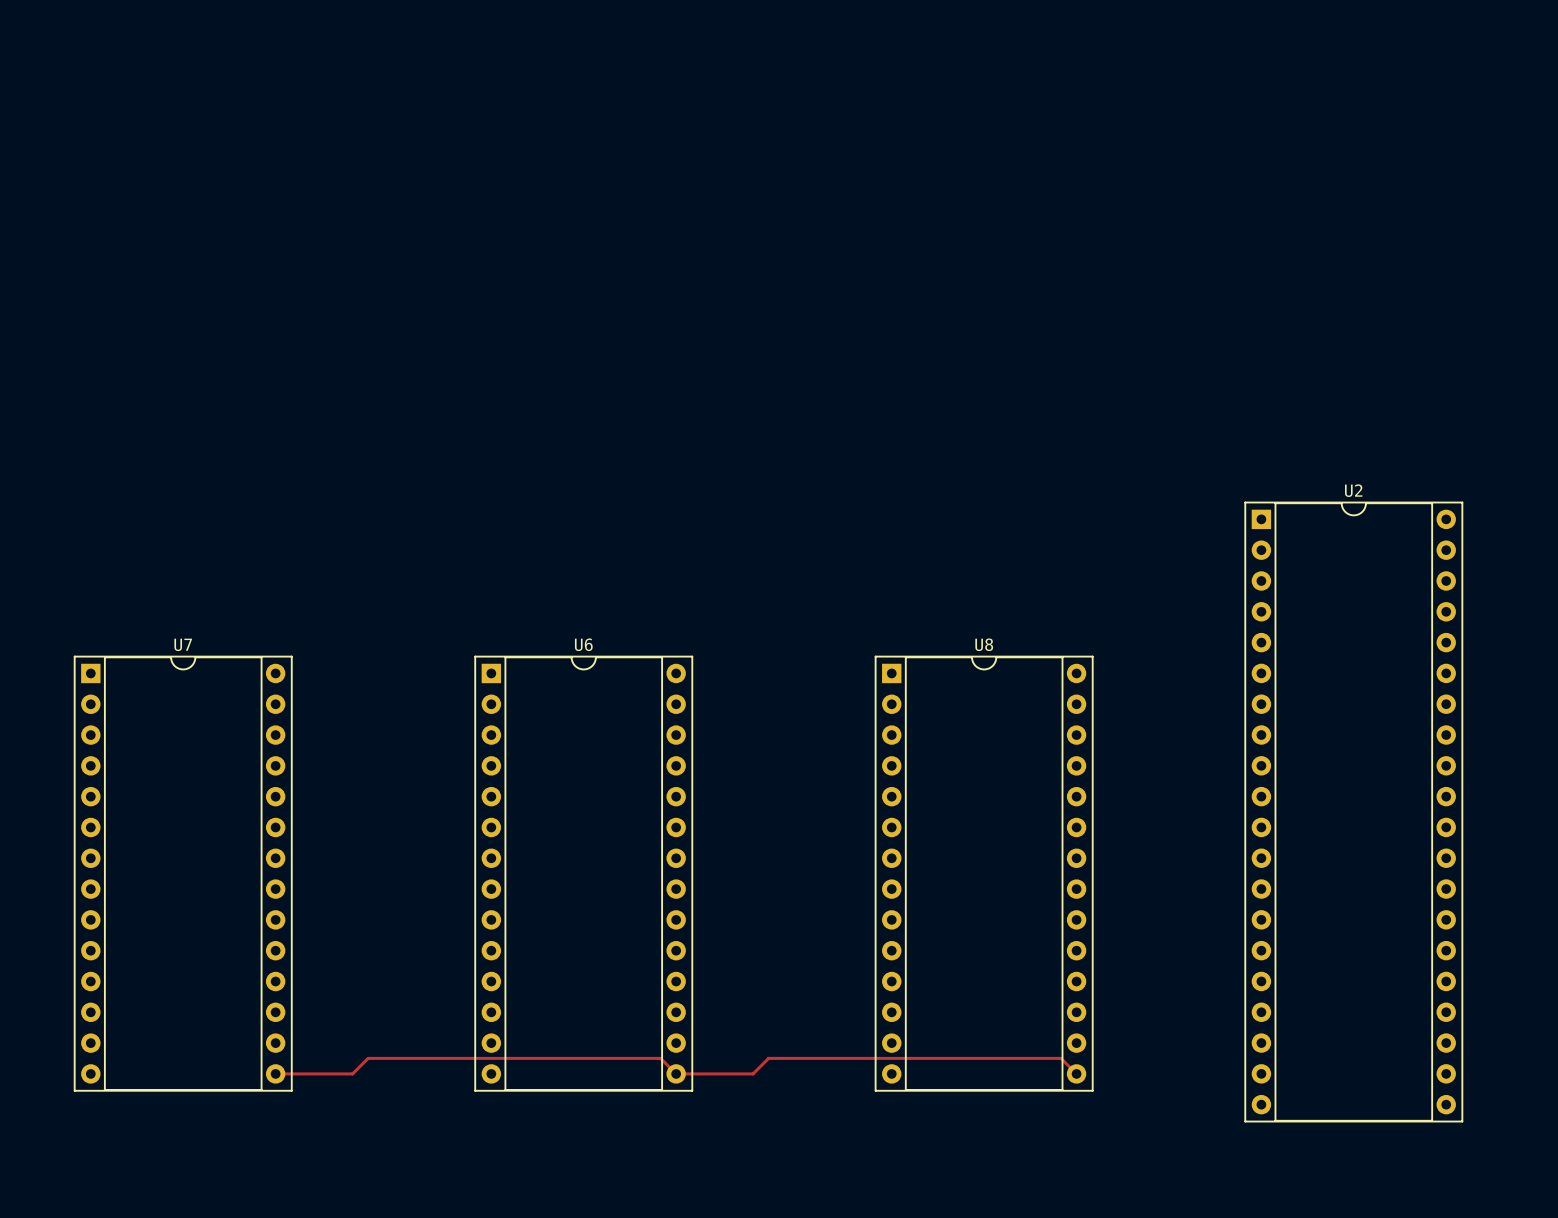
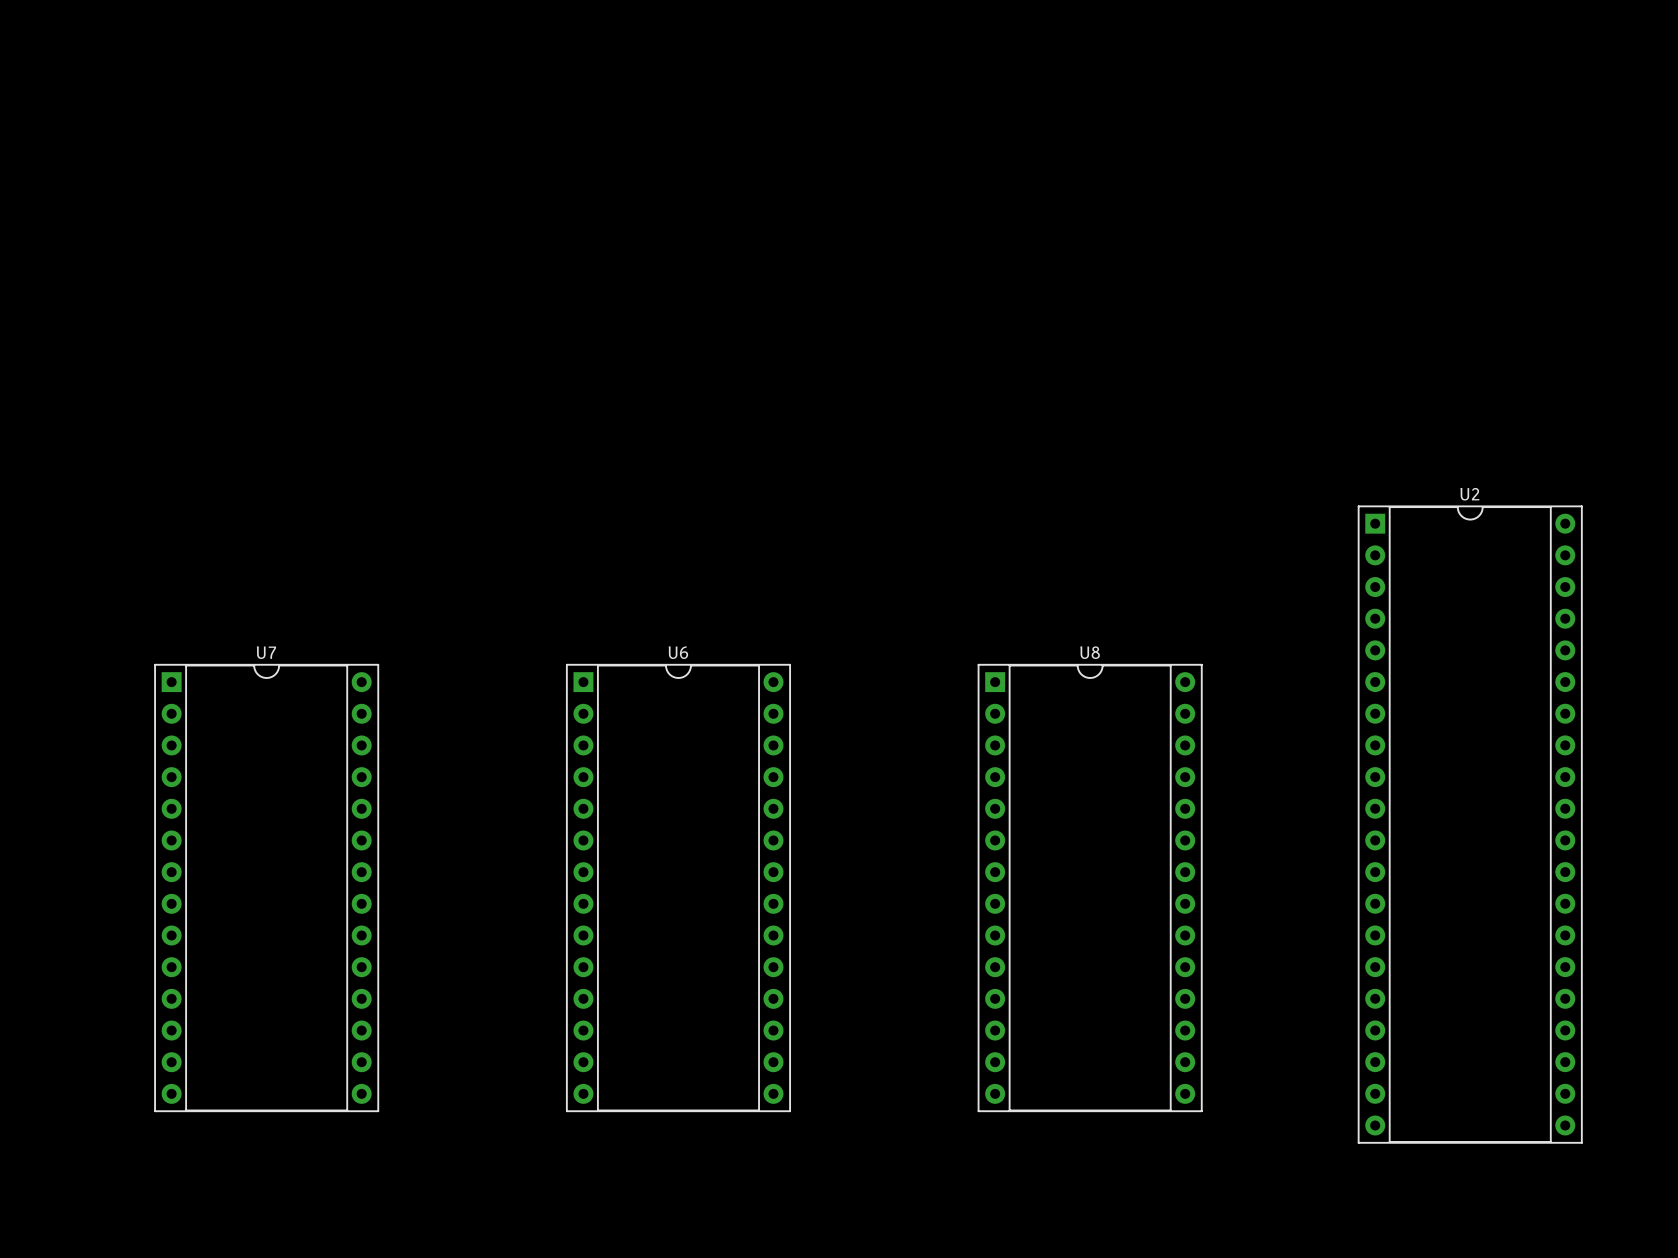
top track: (275, 1073) (352, 1073) (368, 1058) (660, 1058) (676, 1073) (753, 1073) (768, 1058) (1061, 1058) (1076, 1073) -> none

